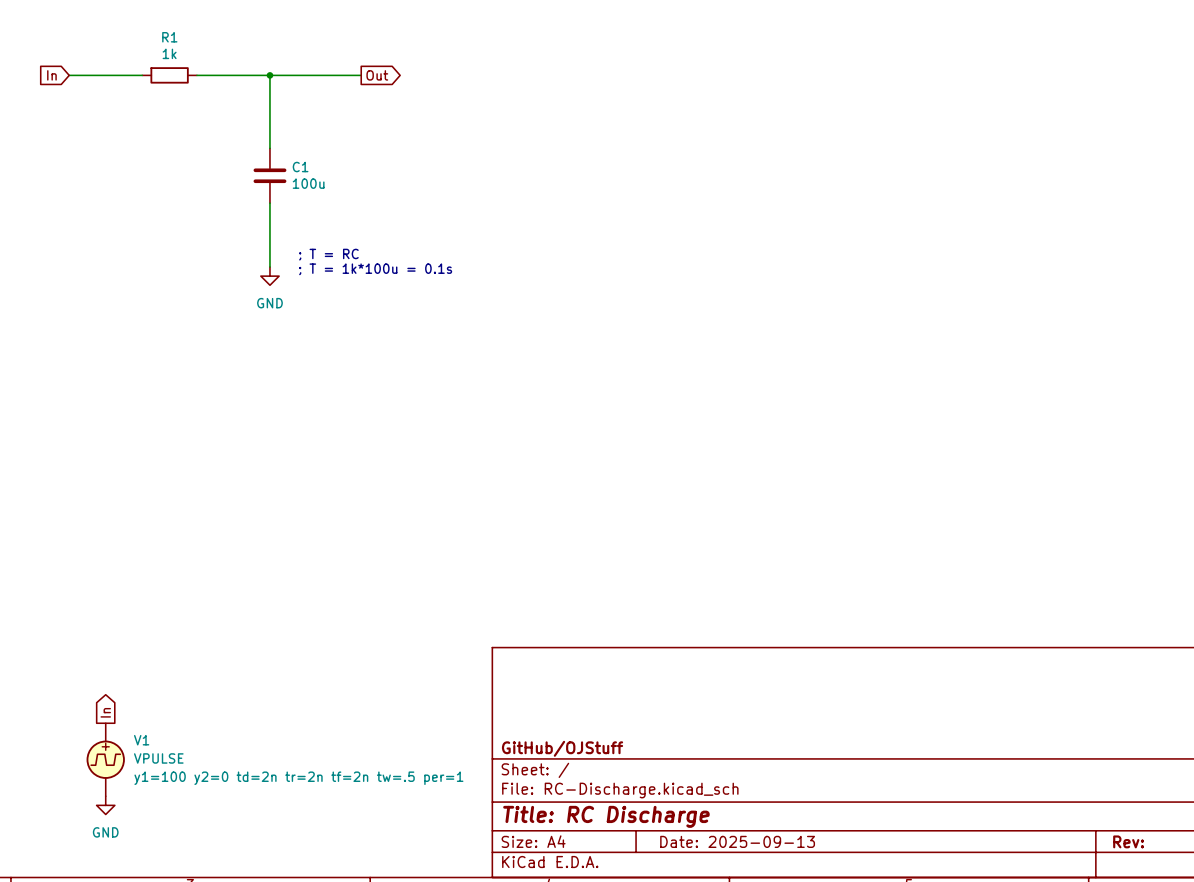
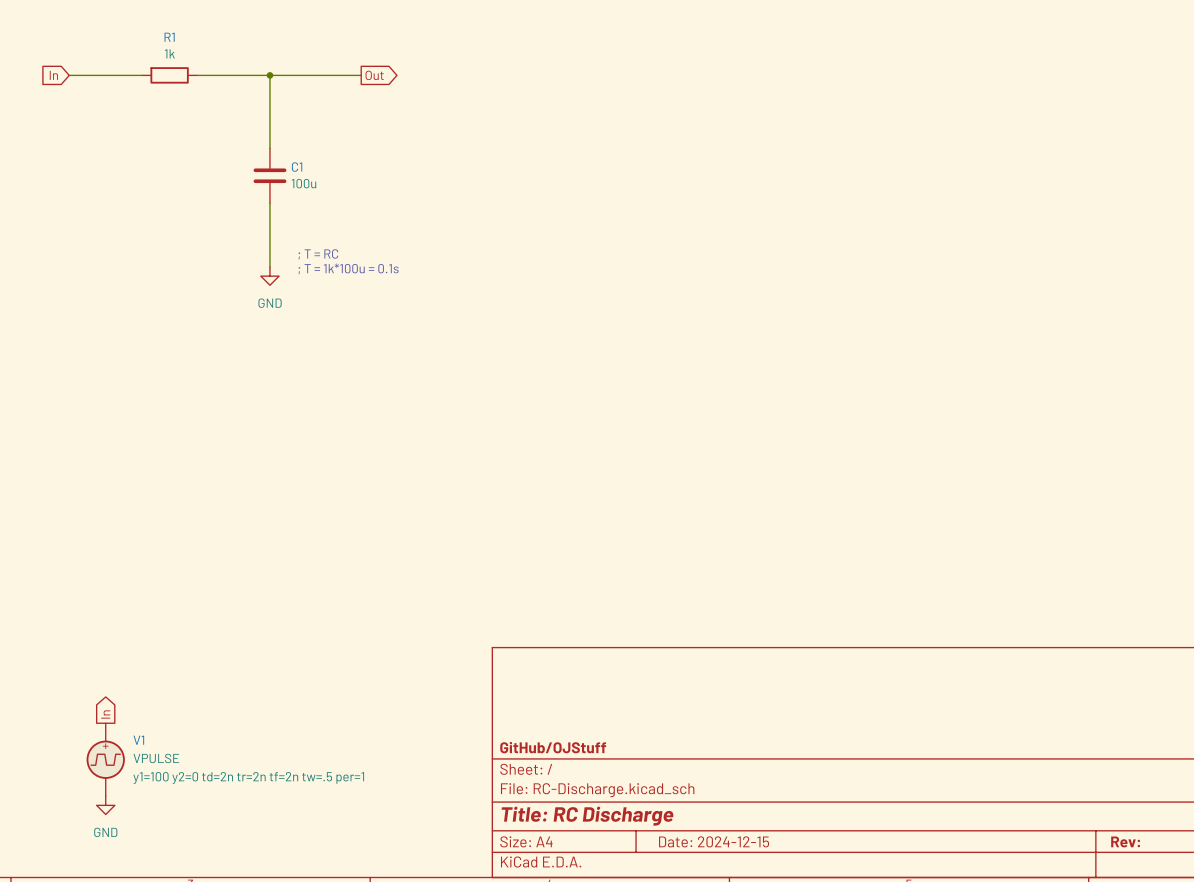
title block: Date: 2025-09-13 (737, 841) -> Date: 2024-12-15 (714, 841)

